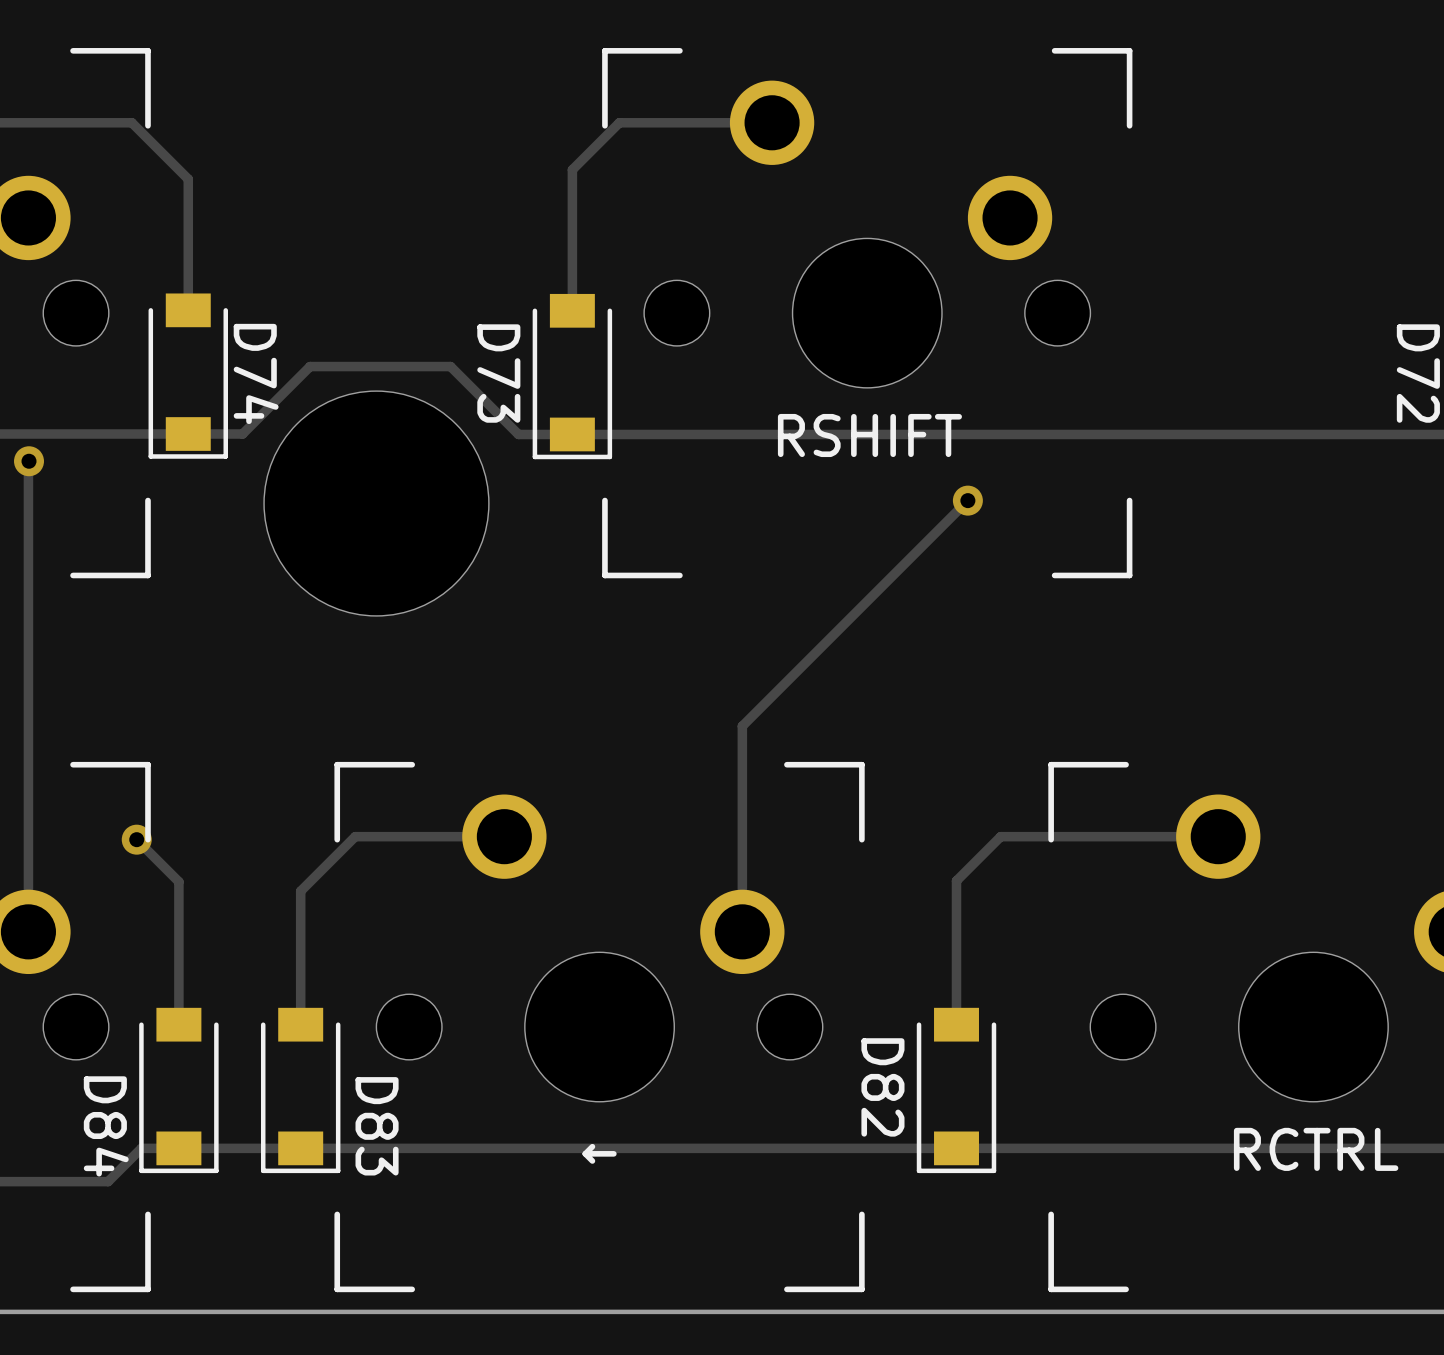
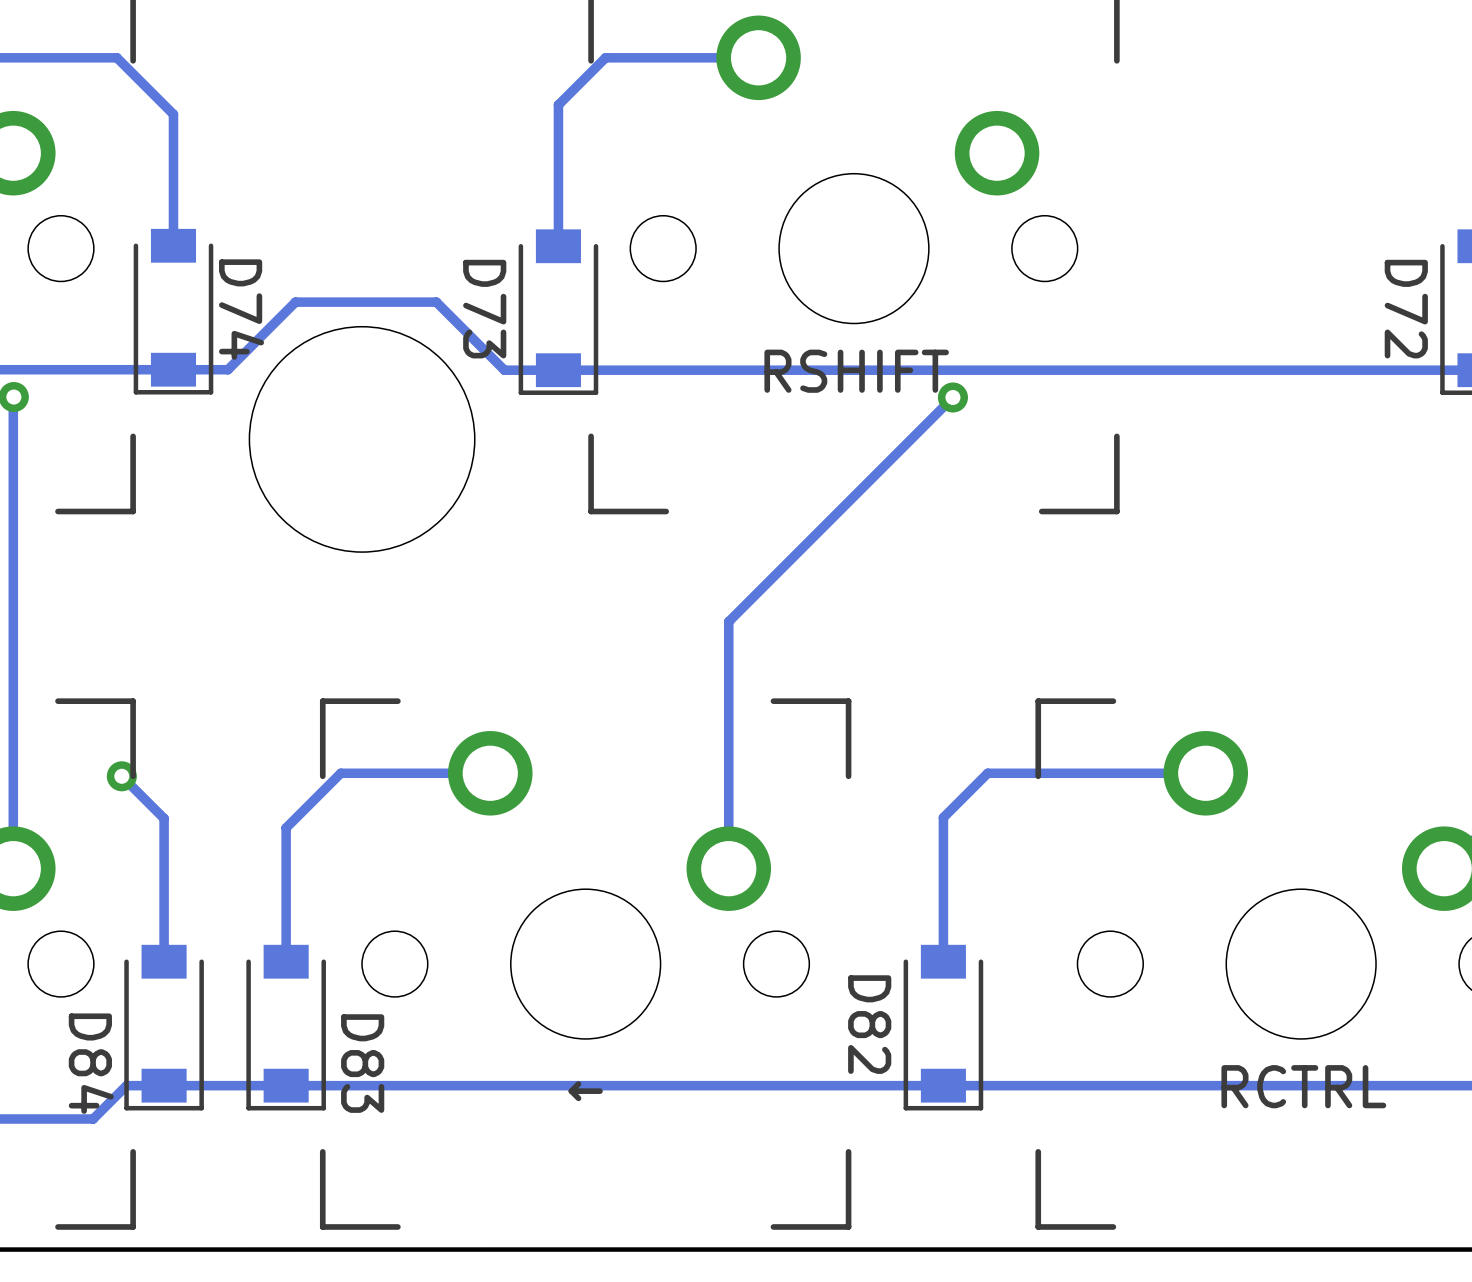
track: (967, 500) (742, 726) -> (952, 397) (728, 621) (728, 662)
via position: (967, 500) -> (952, 397)

